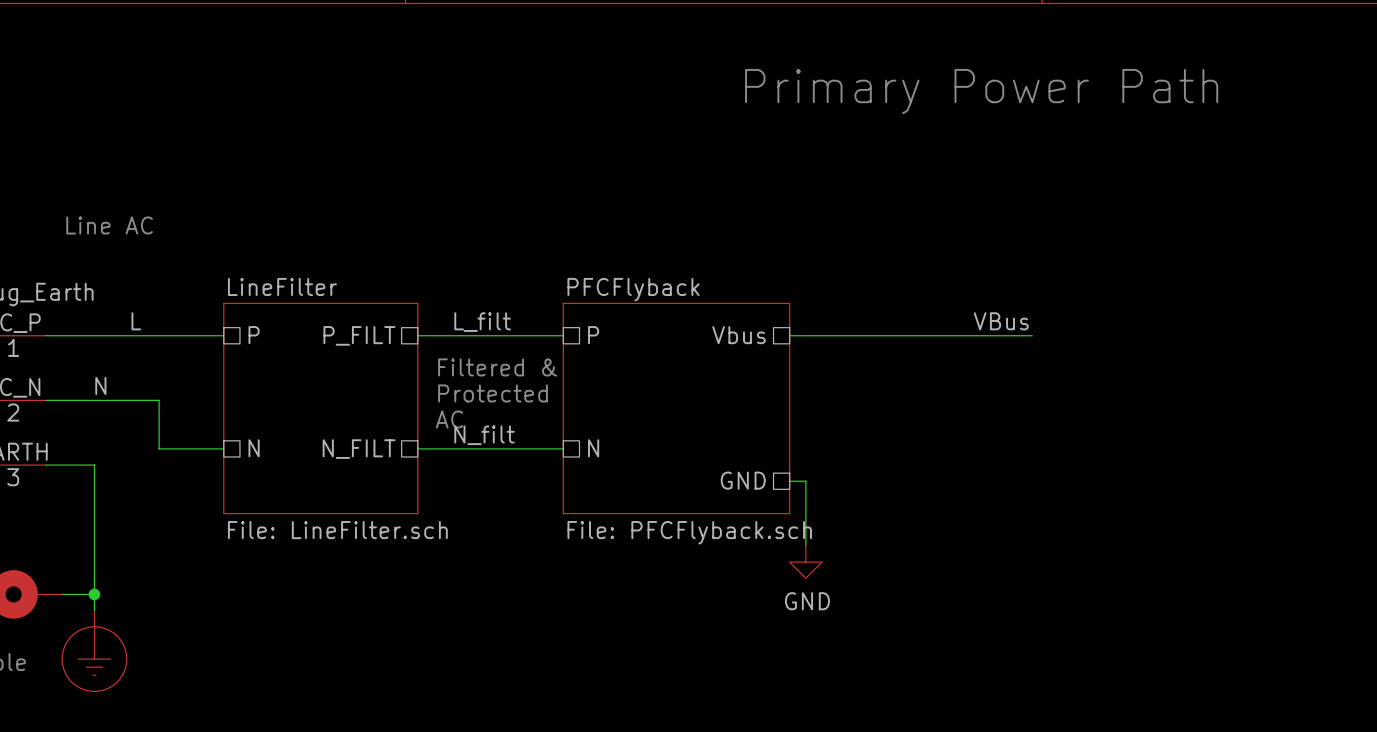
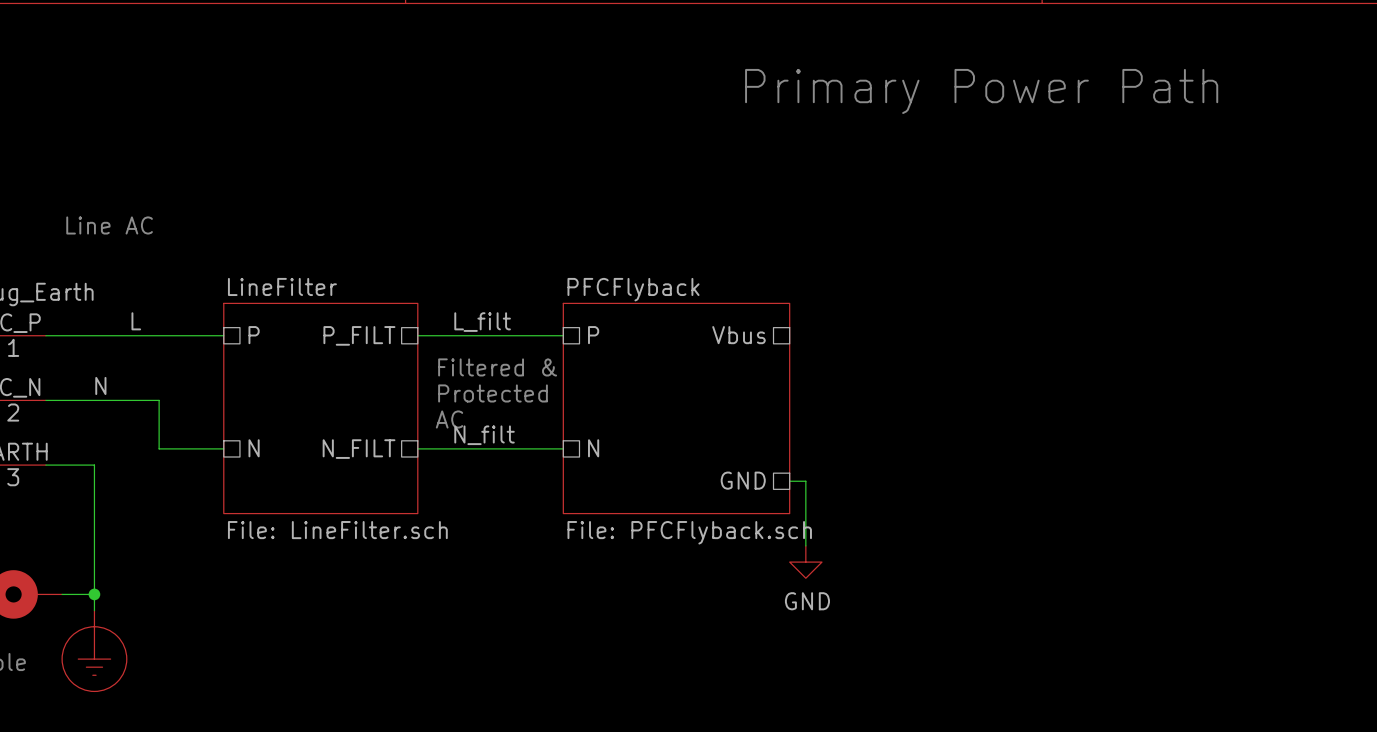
label: VBus (1001, 321) -> none
wire: (789, 335) (1032, 335) -> none

